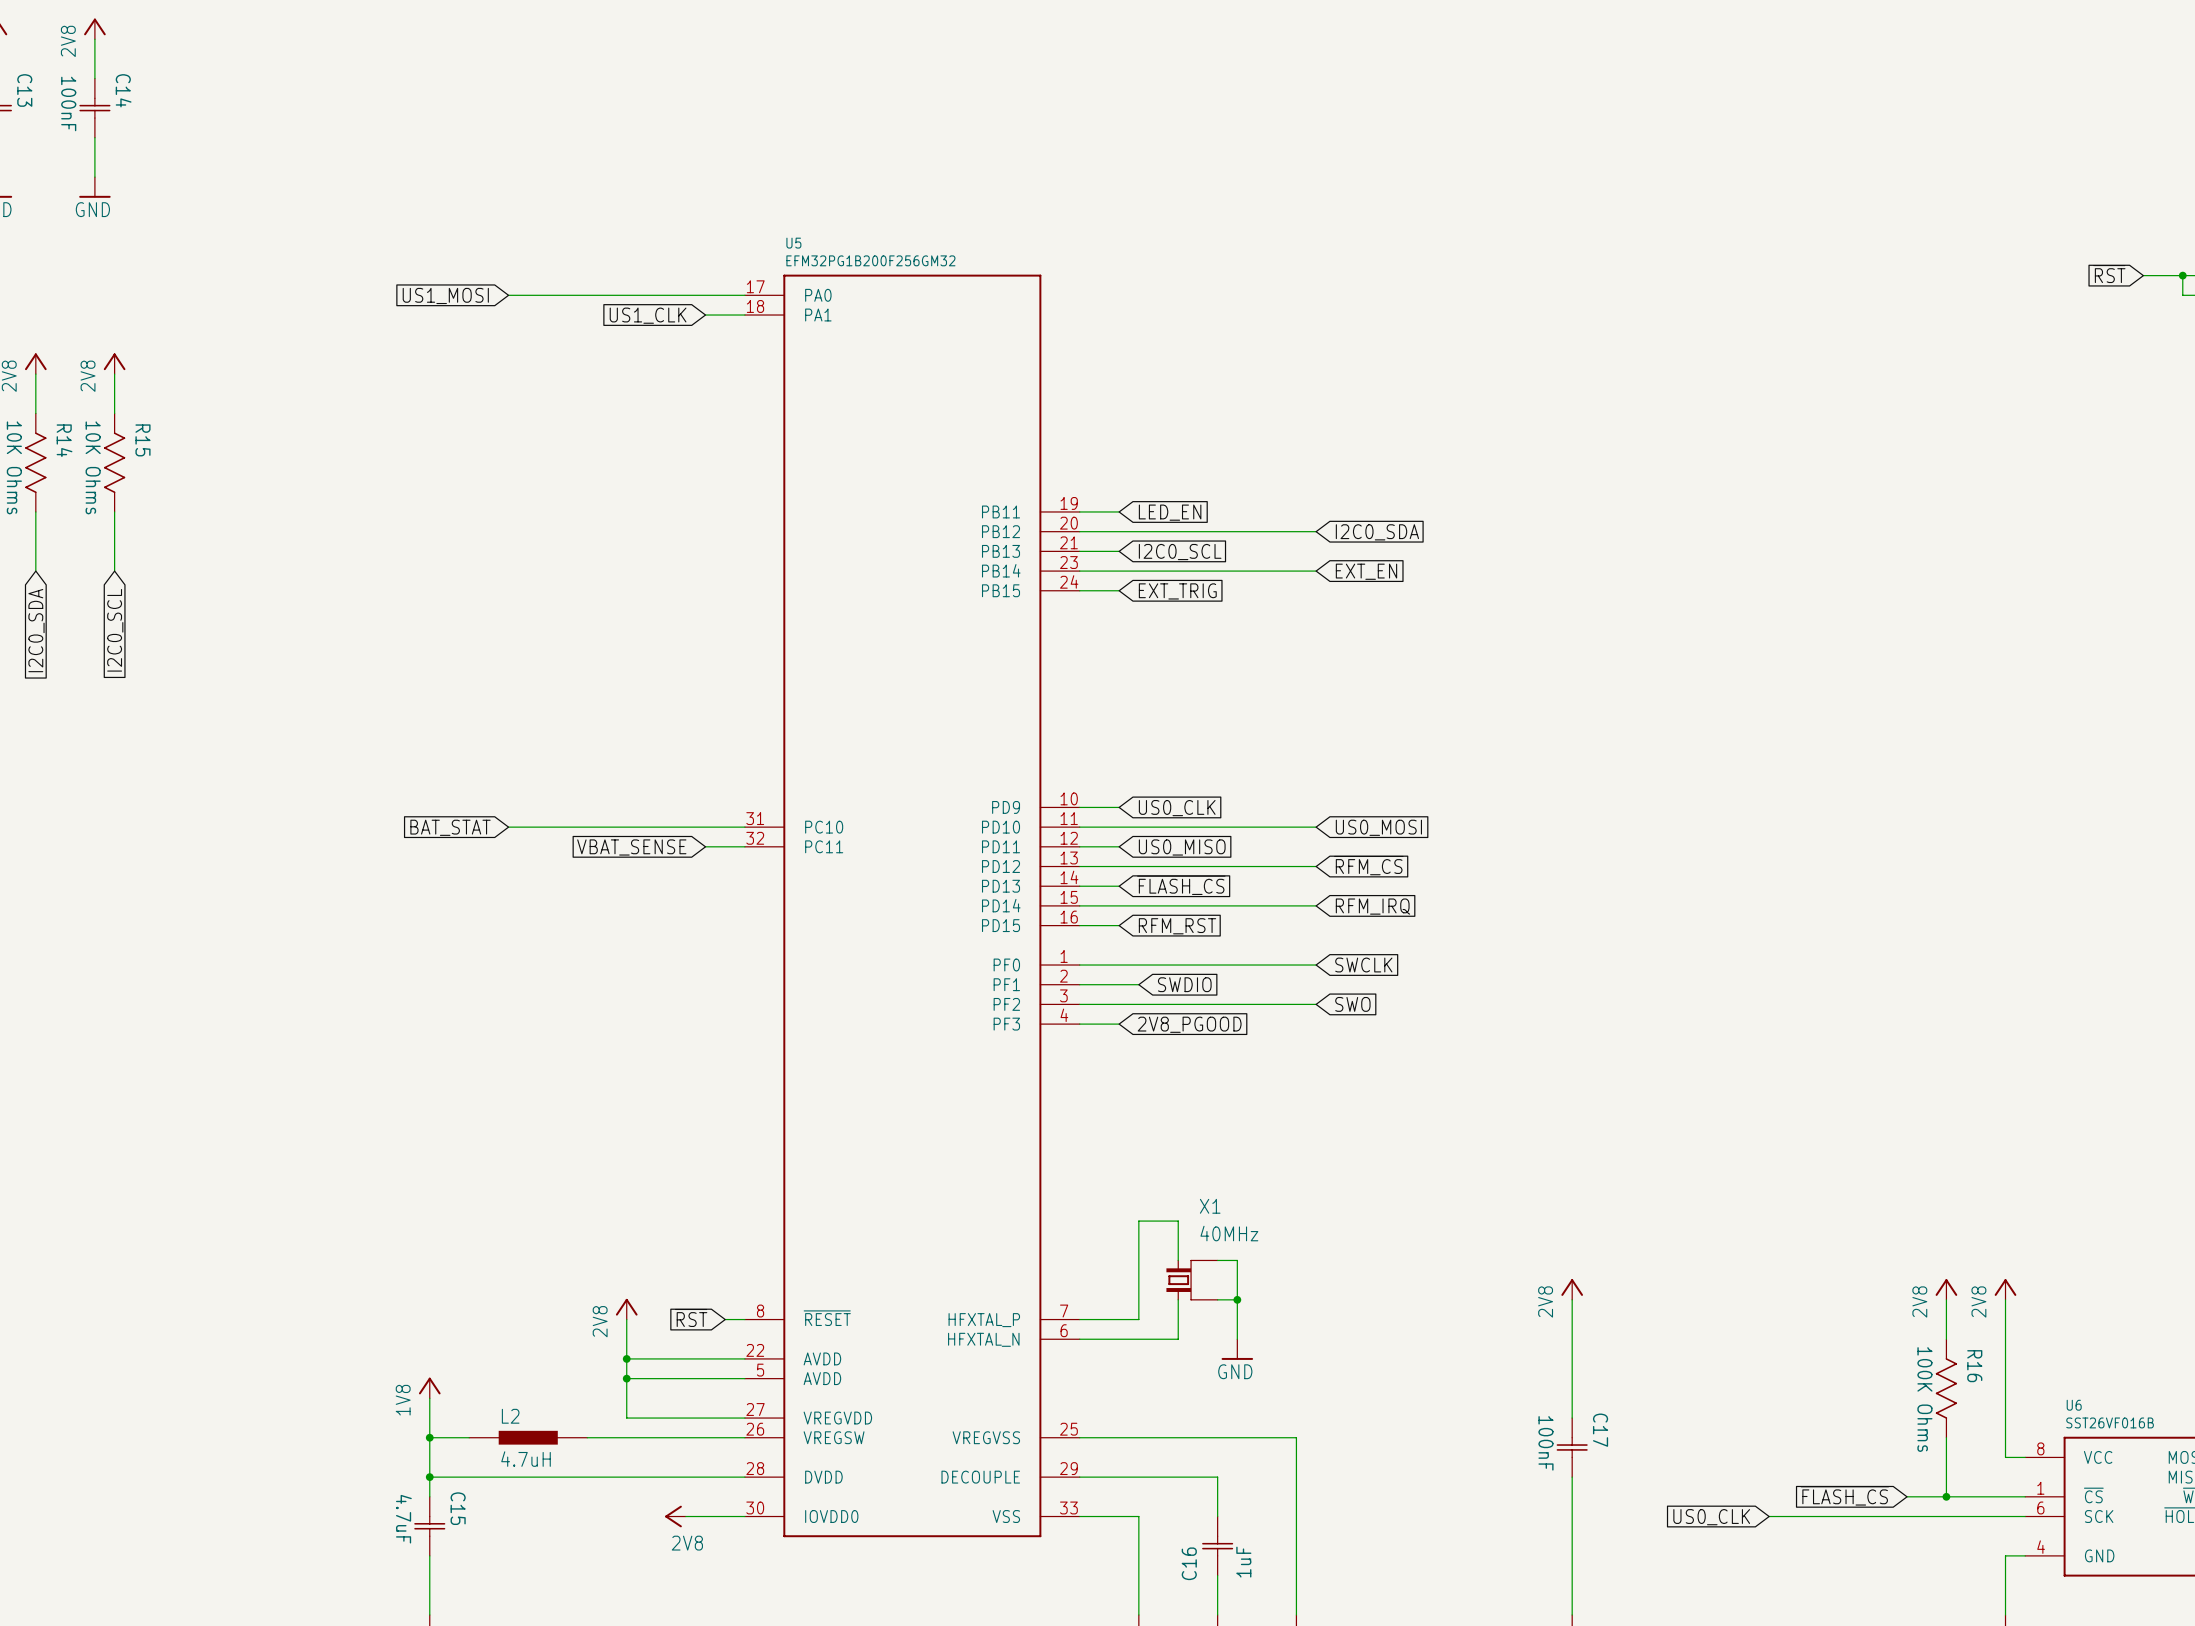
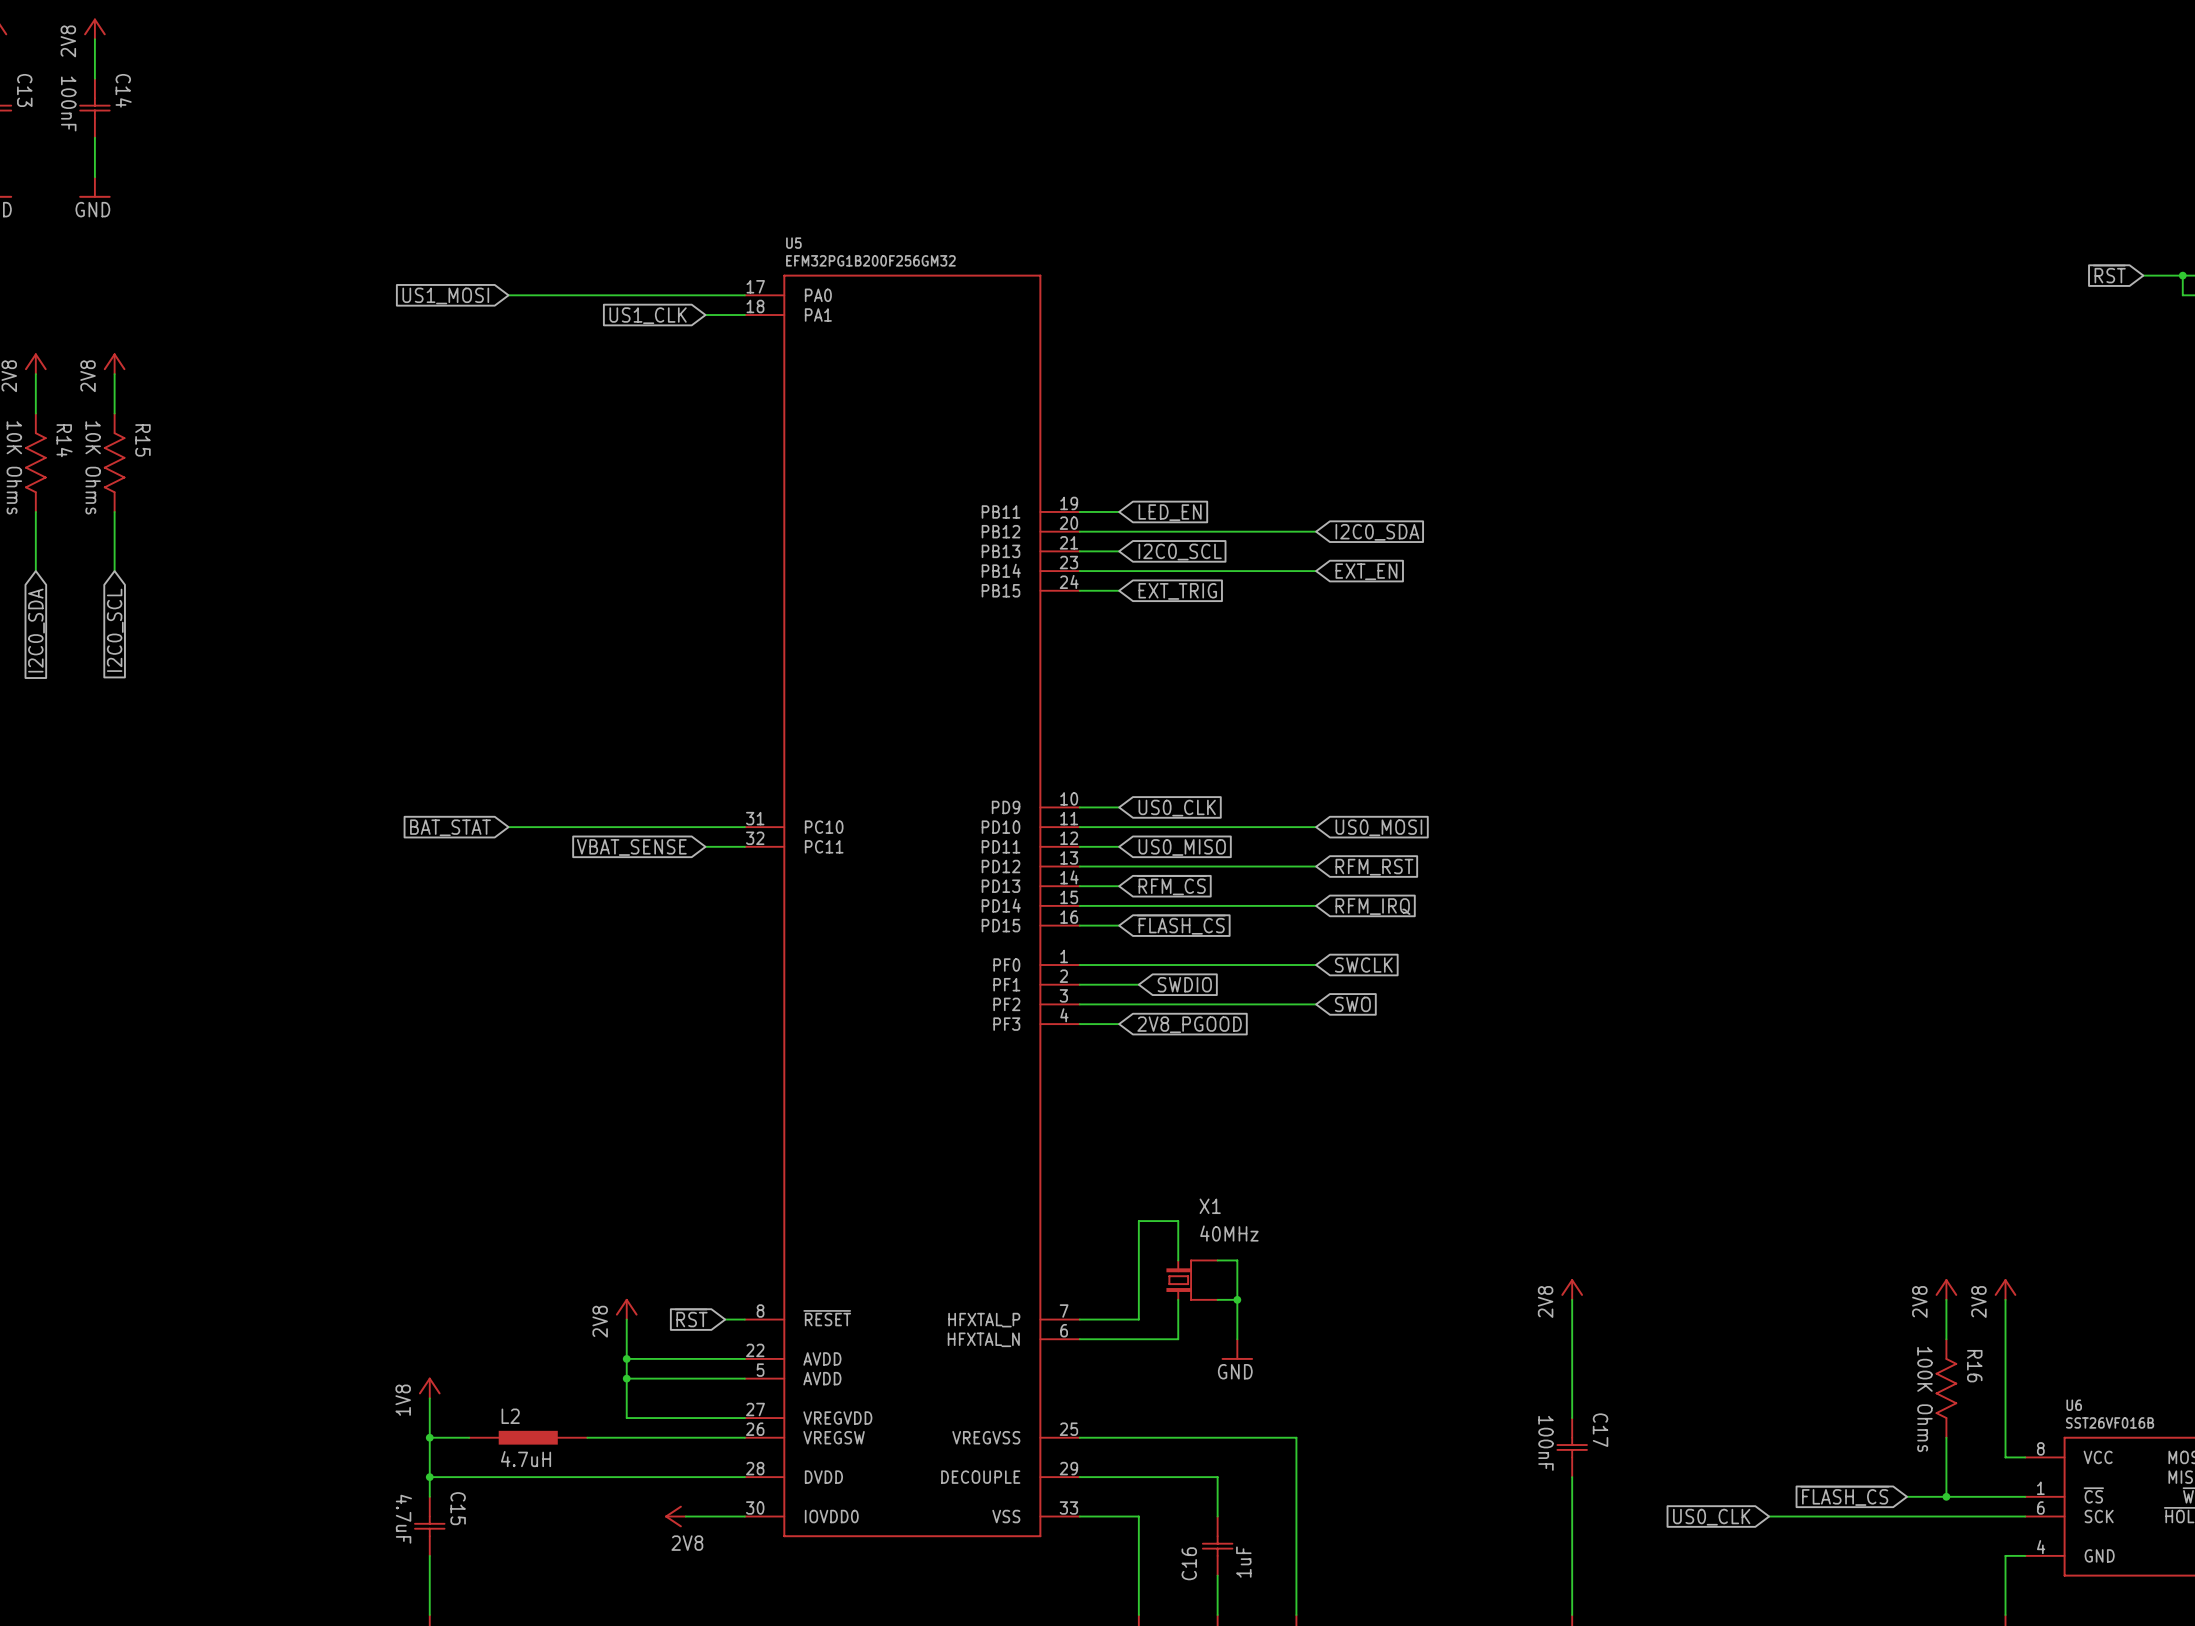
global label: ~{RFM_CS} (1368, 865) -> RFM_RST (1374, 867)
global label: ~{FLASH_CS} (1181, 885) -> ~{RFM_CS} (1171, 885)
global label: RFM_RST (1177, 926) -> ~{FLASH_CS} (1181, 924)

